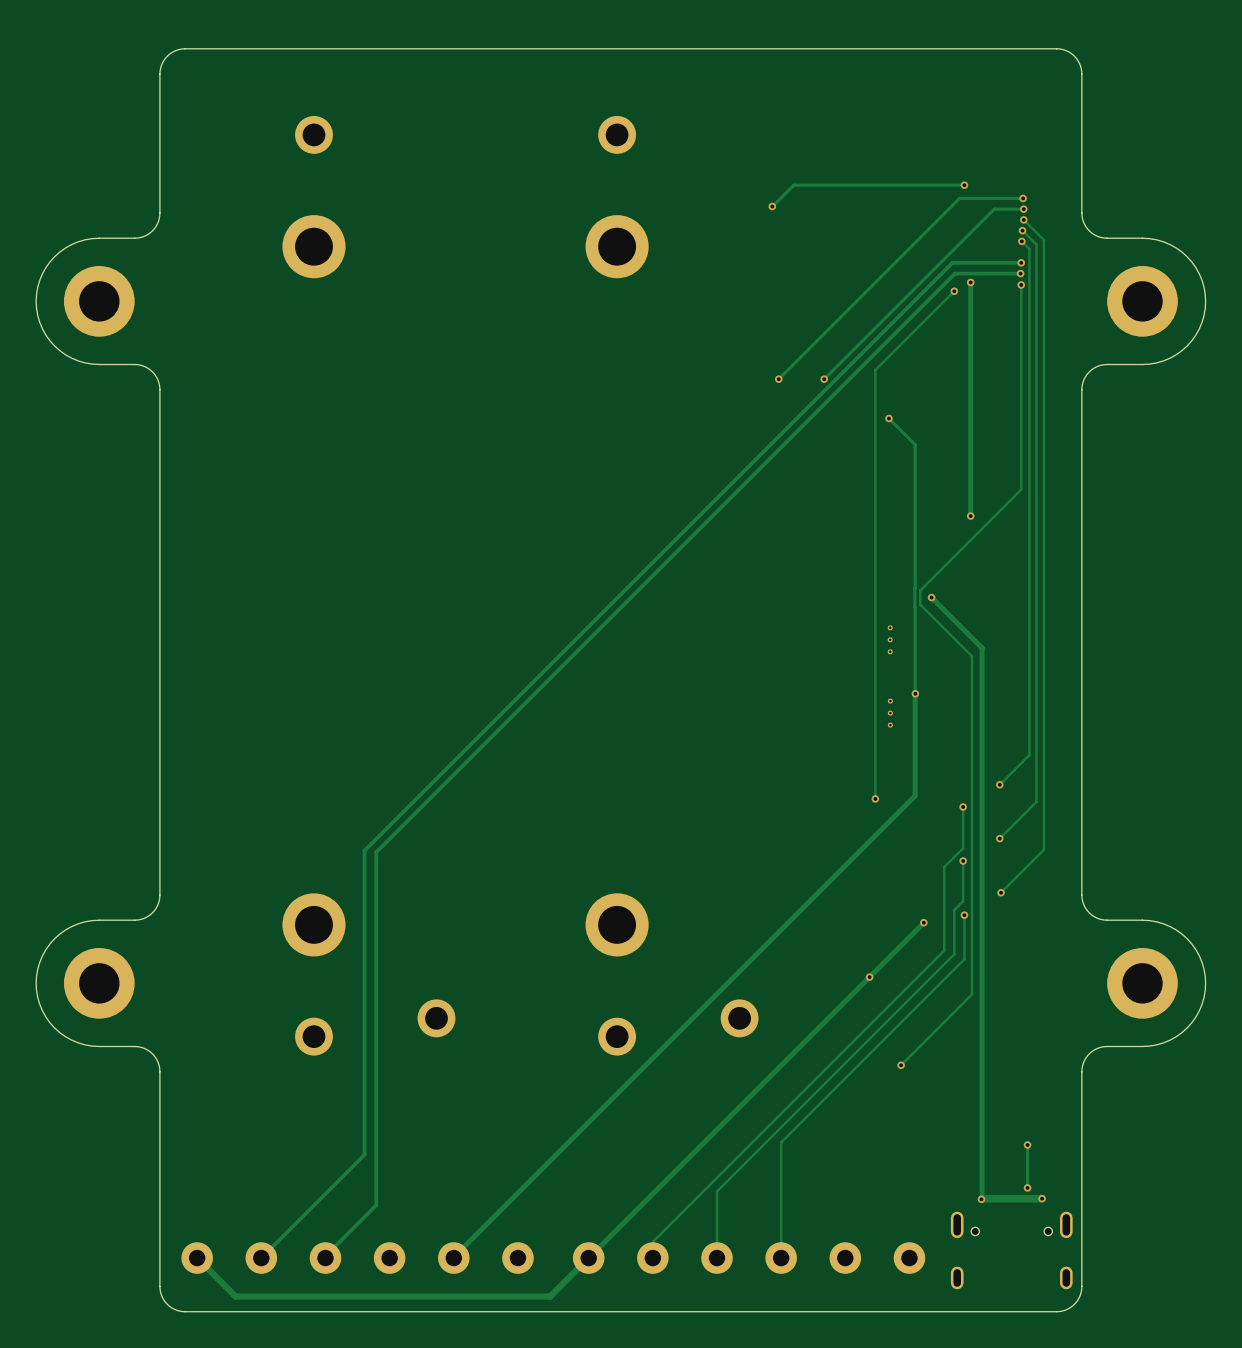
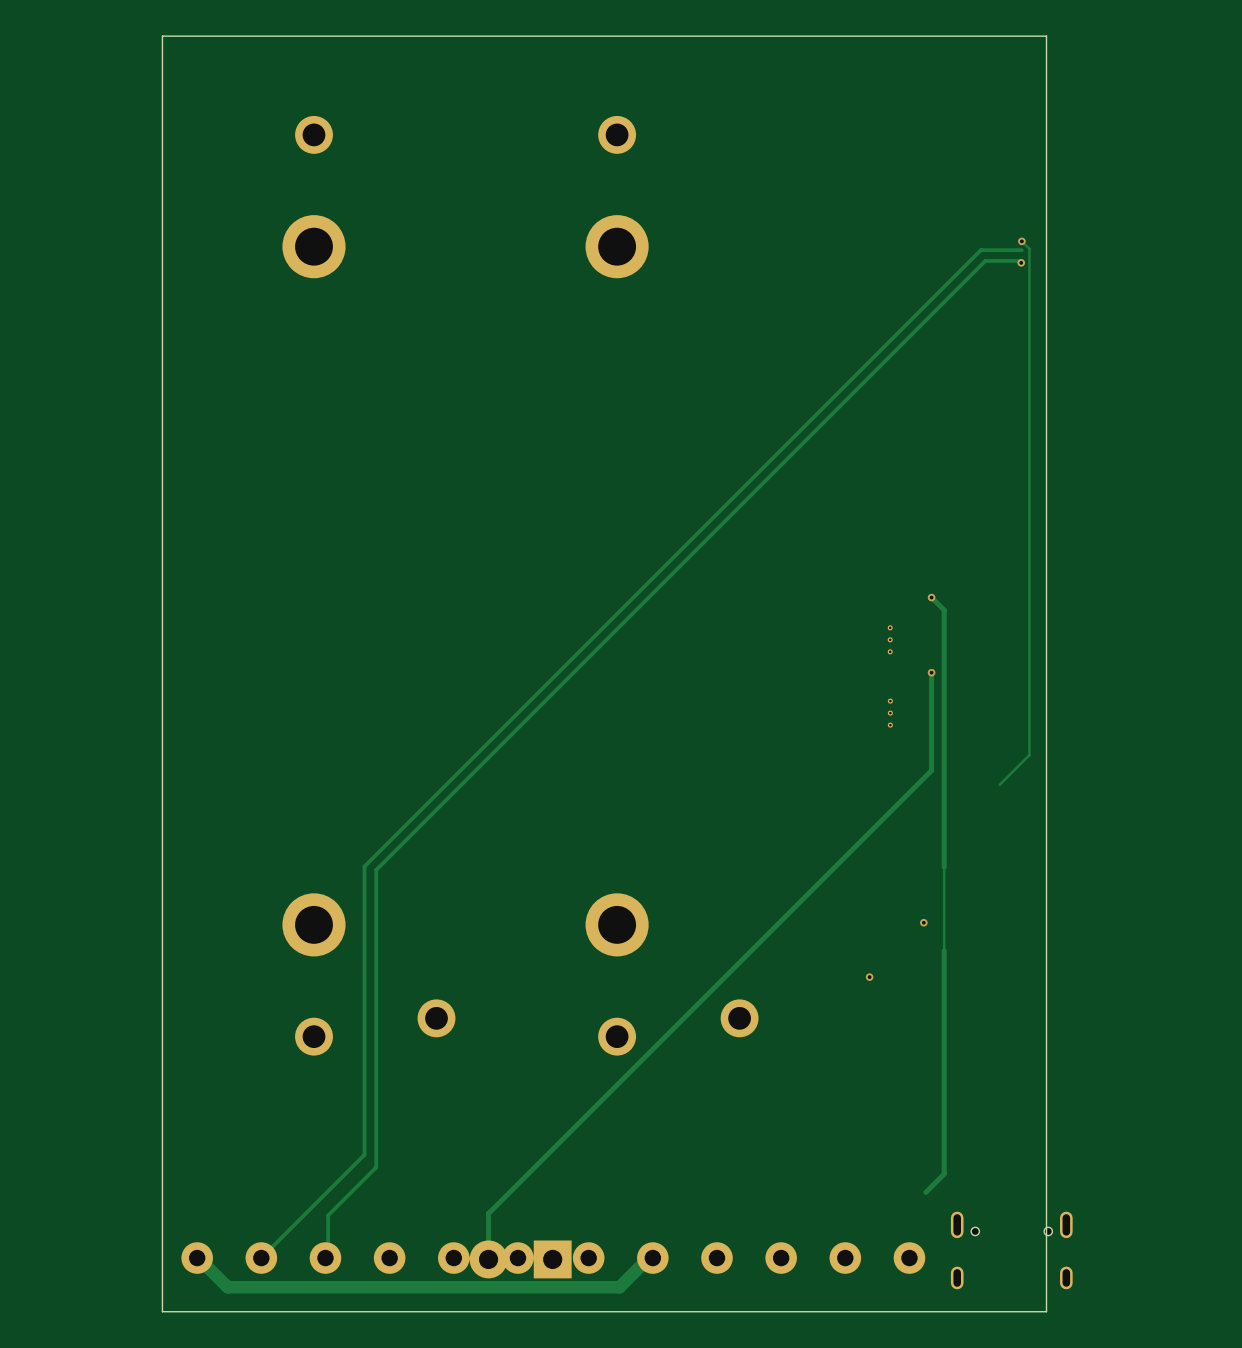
track: (964, 185) (793, 185) (772, 206) -> none
via: (964, 185) -> none
track: (1023, 198) (959, 198) (778, 379) -> none
via: (1023, 198) -> none
via: (772, 206) -> none
track: (1023, 209) (994, 209) (824, 379) -> none
via: (1023, 209) -> none
track: (1023, 219) (1043, 240) (1043, 849) (1001, 892) -> none
via: (1023, 219) -> none
track: (1022, 230) (1036, 244) (1036, 801) (999, 838) -> none
via: (1022, 230) -> none
track: (1021, 262) (952, 262) (364, 850) (364, 866) -> (1021, 250) (980, 250) (364, 866)
track: (1020, 273) (954, 273) (376, 852) (376, 869) -> (1021, 260) (985, 260) (376, 869)
via: (1020, 273) -> none
track: (970, 282) (970, 516) -> none
via: (970, 282) -> none
track: (1021, 284) (1021, 489) (920, 590) (920, 604) (971, 656) (971, 994) (901, 1065) -> none
via: (1021, 284) -> none
track: (954, 291) (875, 370) (875, 798) -> none
via: (954, 291) -> none
part: (99, 301) -> none
part: (1142, 301) -> none
via: (778, 379) -> none
via: (824, 379) -> none
track: (888, 418) (915, 444) (915, 795) (453, 1258) -> none
via: (888, 418) -> none
via: (970, 516) -> none
track: (944, 610) (982, 648) (982, 1198) -> none
track: none -> (931, 672) (931, 770) (488, 1213) (488, 1259)
via position: (915, 693) -> (931, 672)
via: (999, 784) -> none
via: (875, 798) -> none
track: (963, 807) (963, 848) (944, 867) -> (944, 610) (944, 867)
via: (963, 807) -> none
via: (999, 838) -> none
track: (963, 861) (963, 901) (954, 910) (954, 954) (717, 1191) (717, 1258) -> none
via: (963, 861) -> none
via: (1001, 892) -> none
track: (964, 915) (964, 959) (781, 1142) (781, 1258) -> none
via: (964, 915) -> none
track: (923, 922) (550, 1296) (235, 1296) (197, 1258) -> none
track: (944, 950) (652, 1241) (652, 1258) -> (944, 950) (944, 1174) (925, 1192)
part: (99, 983) -> none
part: (1142, 983) -> none
via: (901, 1065) -> none
track: (1027, 1145) (1027, 1187) -> none
via: (1027, 1145) -> none
track: (376, 1167) (376, 1205) (325, 1258) -> (376, 1167) (328, 1215) (328, 1259)
via: (1027, 1187) -> none
track: (1042, 1198) (982, 1198) -> none
via: (1042, 1198) -> none
via: (981, 1199) -> none
part: none -> (520, 1259)
track: none -> (648, 1259) (619, 1287) (227, 1287) (199, 1259)
board edge: (1046, 1311) (1059, 1311) (1070, 1307) (1077, 1299) (1081, 1289) (1081, 1071) (1084, 1060) (1091, 1052) (1101, 1047) (1149, 1046) (1163, 1042) (1176, 1036) (1187, 1028) (1195, 1016) (1204, 997) (1205, 983) (1204, 969) (1195, 949) (1187, 938) (1176, 929) (1163, 923) (1149, 920) (1098, 918) (1087, 910) (1082, 897) (1082, 384) (1087, 374) (1098, 365) (1149, 364) (1163, 360) (1176, 354) (1187, 346) (1195, 334) (1204, 315) (1205, 301) (1204, 287) (1195, 267) (1187, 256) (1176, 247) (1163, 241) (1149, 238) (1101, 237) (1093, 234) (1085, 226) (1081, 212) (1081, 71) (1074, 56) (1067, 51) (1056, 48) (185, 48) (175, 50) (165, 58) (159, 74) (159, 212) (157, 223) (150, 232) (140, 237) (92, 238) (78, 241) (65, 247) (54, 256) (42, 273) (37, 287) (36, 301) (37, 315) (42, 328) (54, 346) (65, 354) (78, 360) (92, 364) (143, 365) (152, 371) (159, 384) (159, 897) (154, 910) (143, 918) (92, 920) (78, 923) (65, 929) (54, 938) (42, 955) (37, 969) (36, 983) (39, 1004) (45, 1016) (54, 1028) (65, 1036) (78, 1042) (92, 1046) (140, 1047) (150, 1052) (157, 1060) (159, 1071) (160, 1289) (162, 1297) (169, 1306) (185, 1311) -> (1046, 1311) (1046, 36) (162, 36) (162, 1311) (185, 1311)

